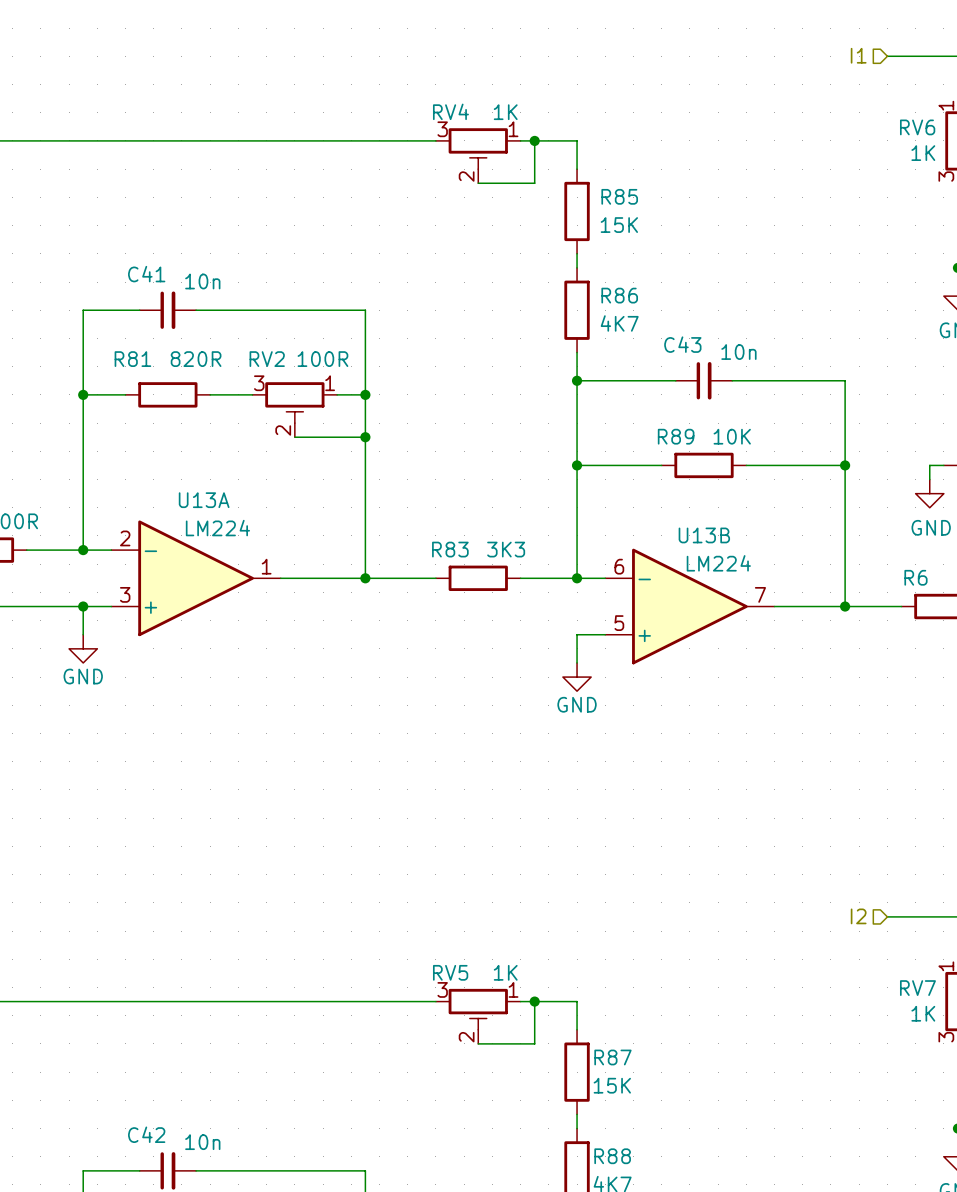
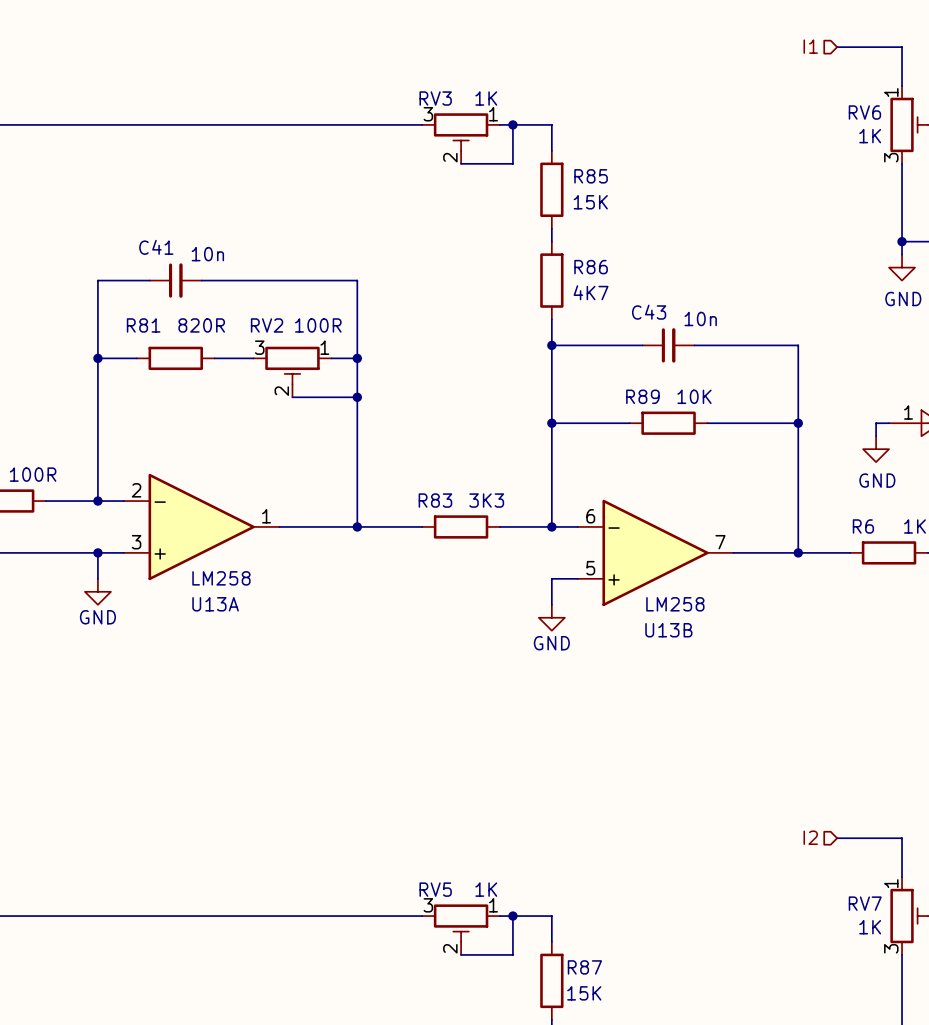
RV4 name: RV4 (450, 111) -> RV3 (435, 98)
U13A name position: U13A (204, 500) -> U13A (215, 604)
U13A value: LM224 (217, 528) -> LM258 (221, 578)
U13B name position: U13B (704, 535) -> U13B (668, 630)
U13B value: LM224 (718, 563) -> LM258 (675, 604)

